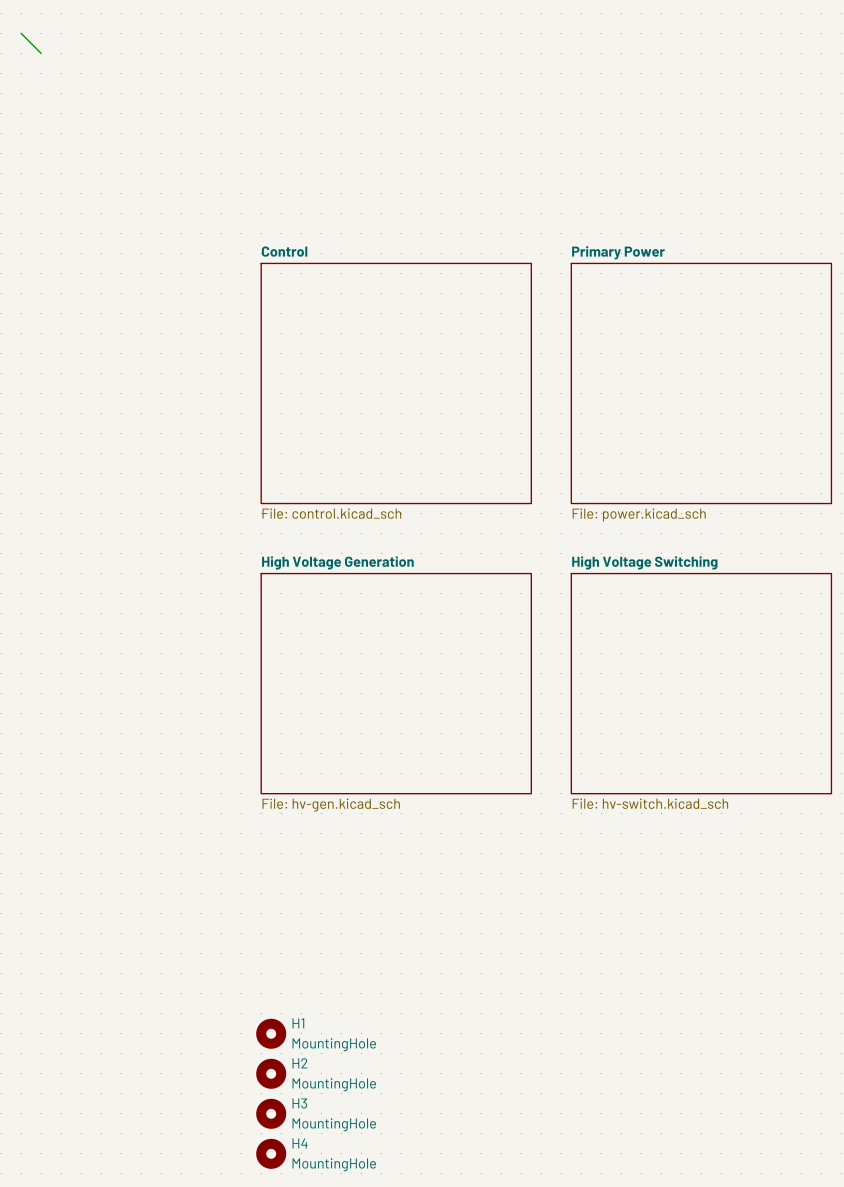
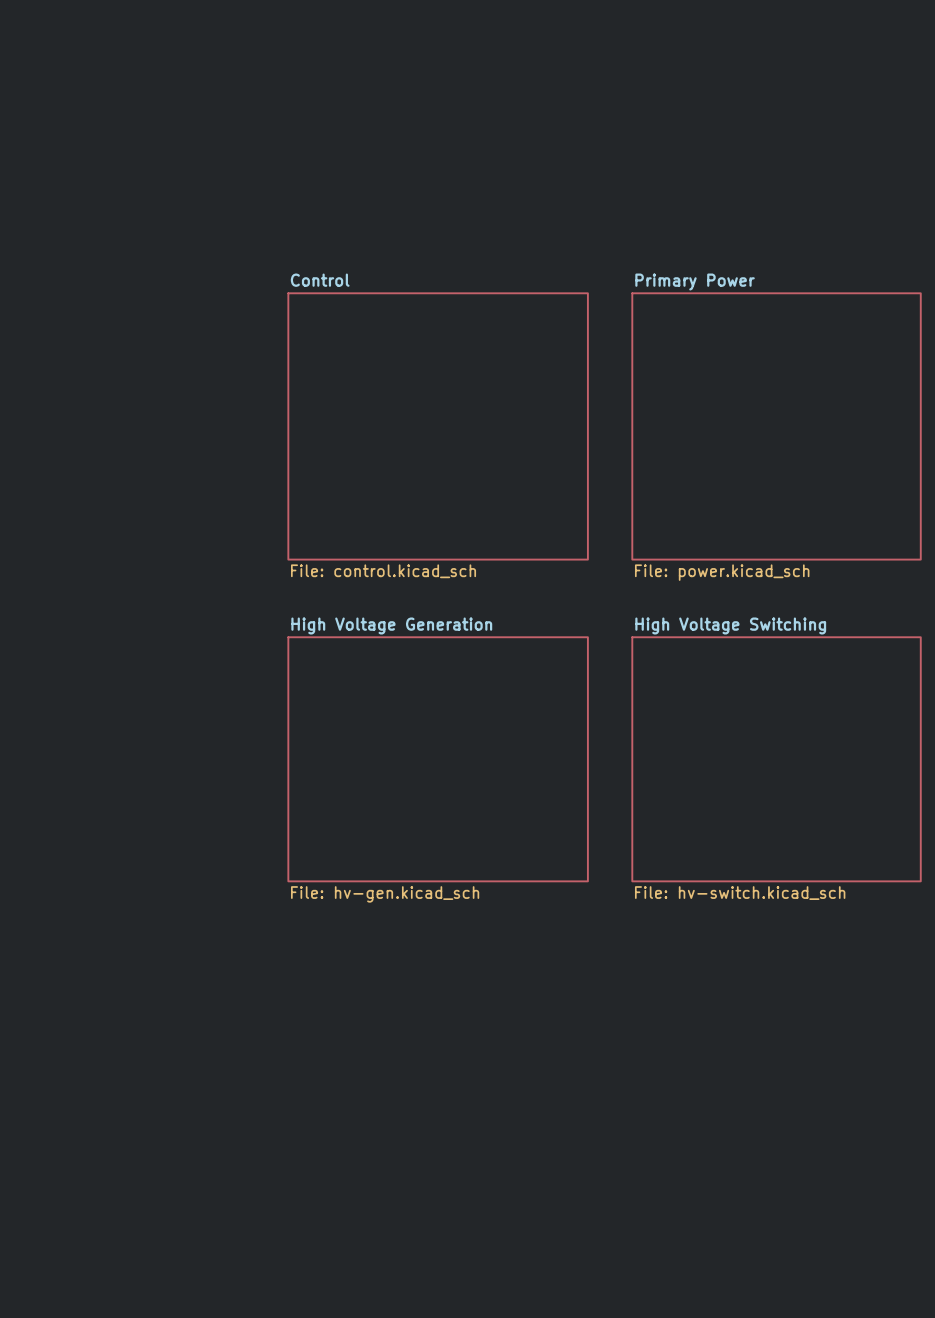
wire: (21, 33) (41, 53) -> none
H1: MountingHole (271, 1033) -> none
H2: MountingHole (271, 1073) -> none
H3: MountingHole (271, 1113) -> none
H4: MountingHole (271, 1153) -> none

